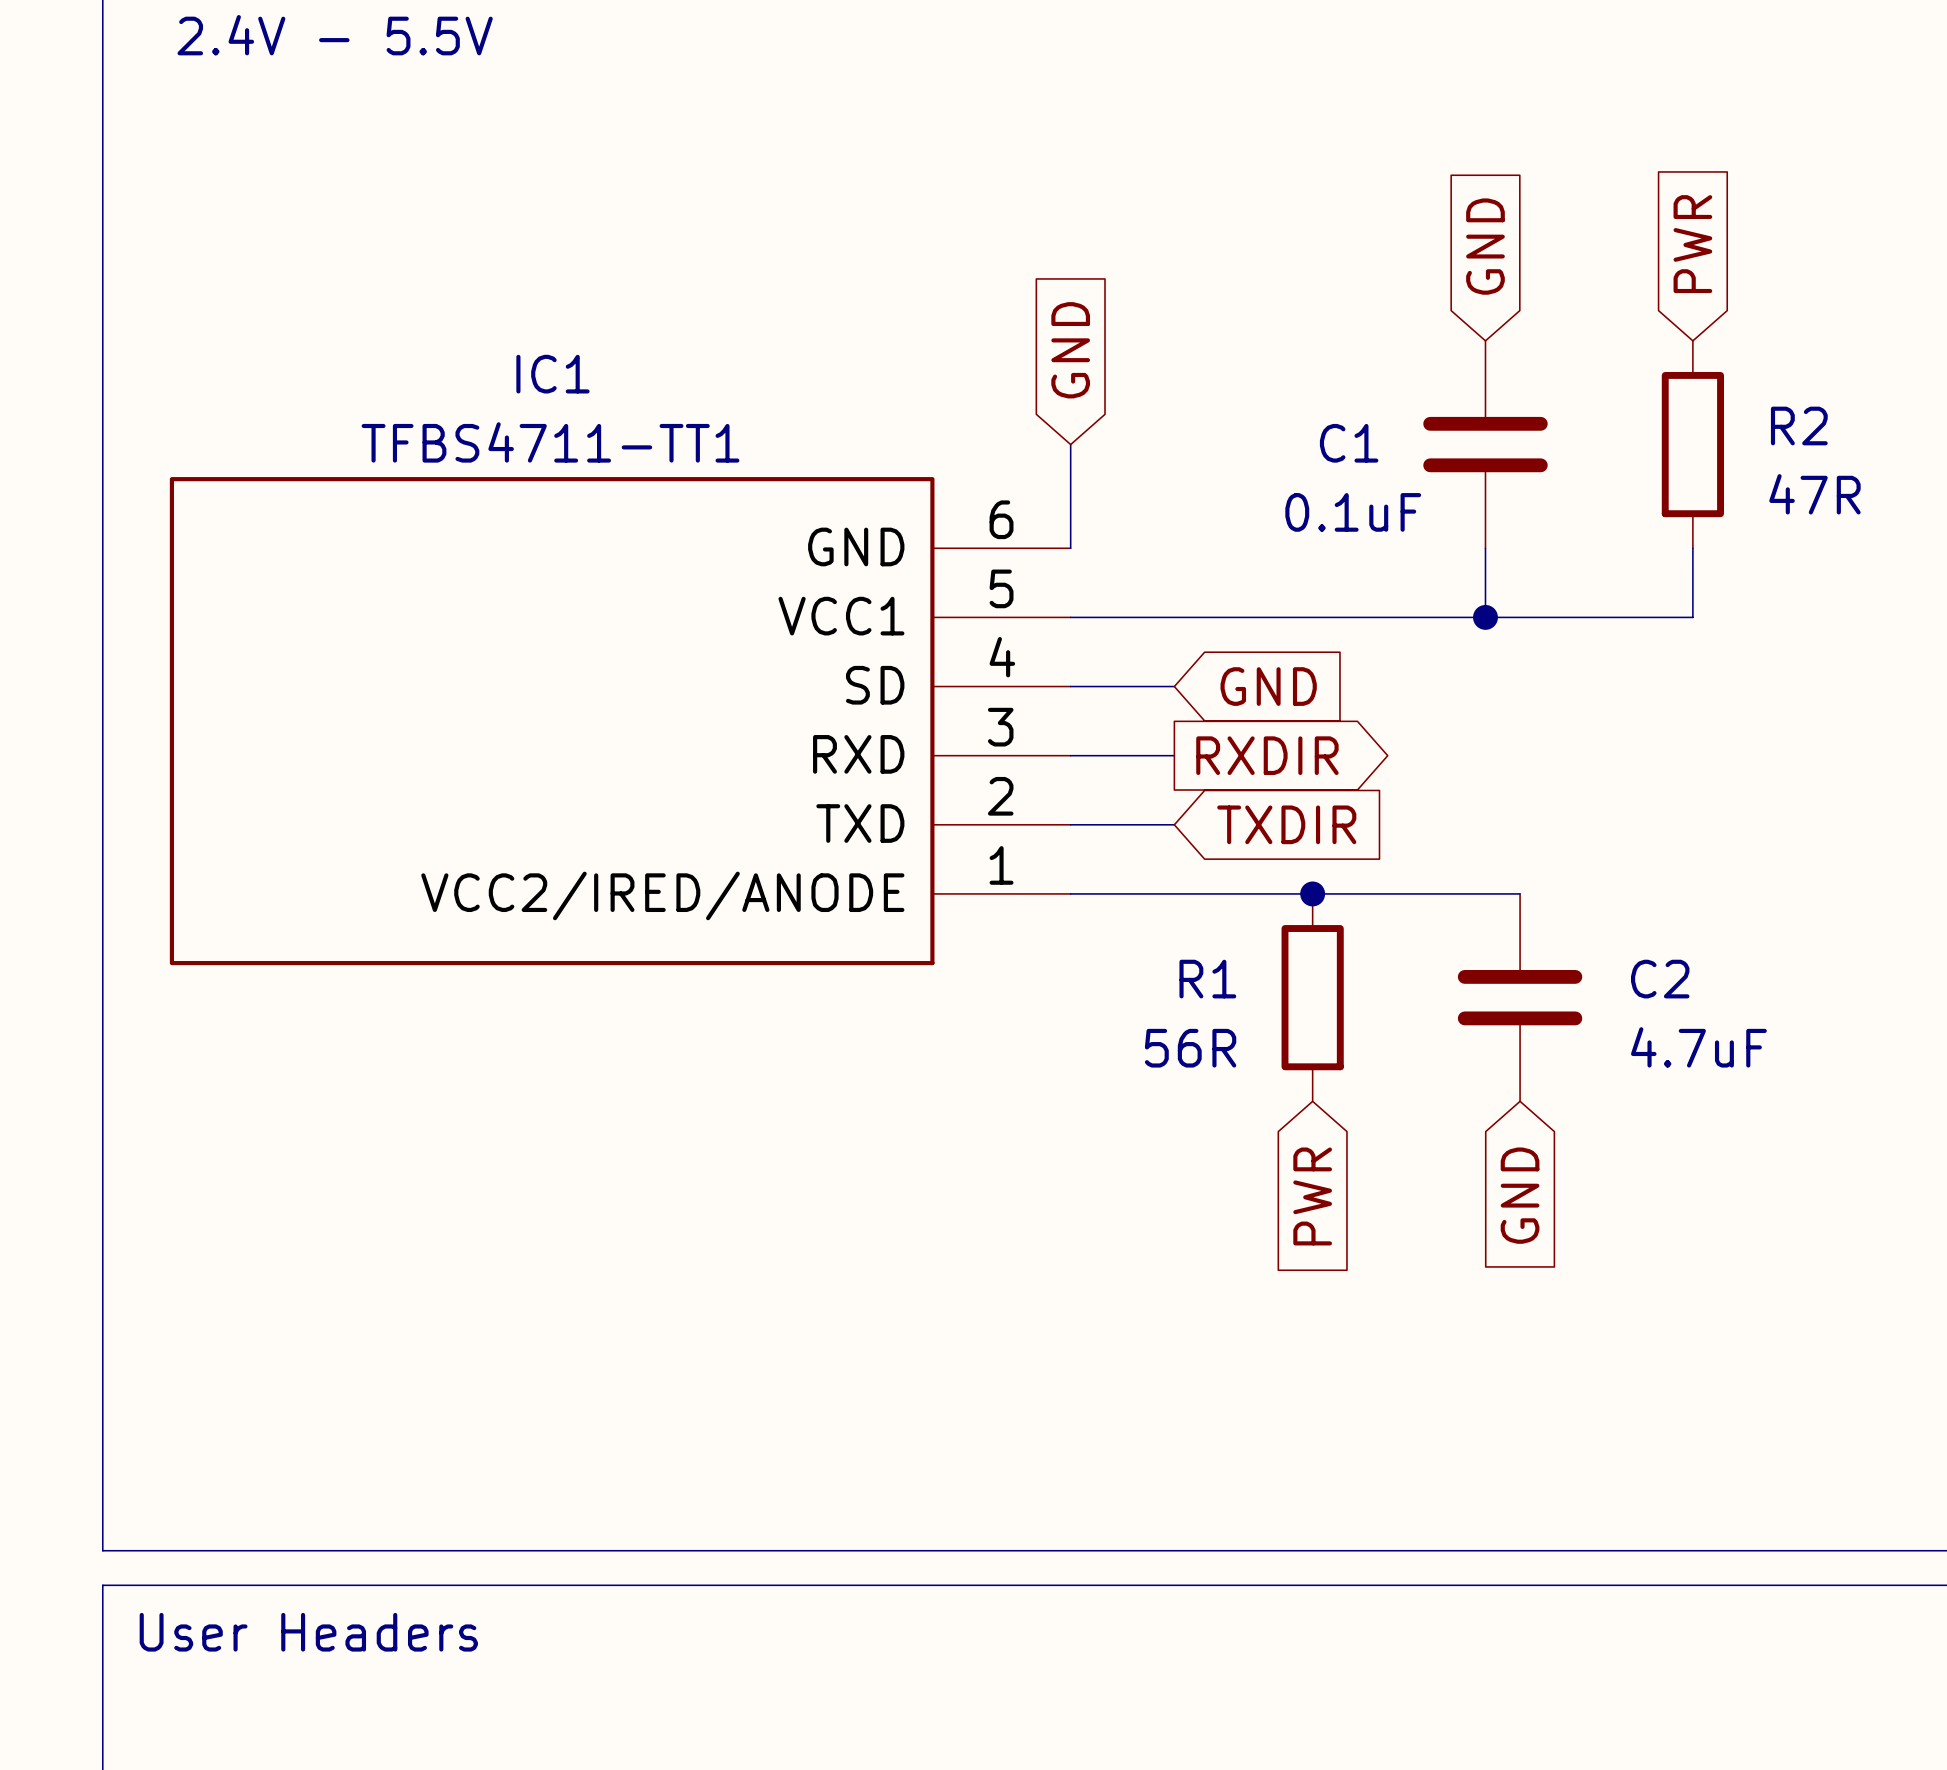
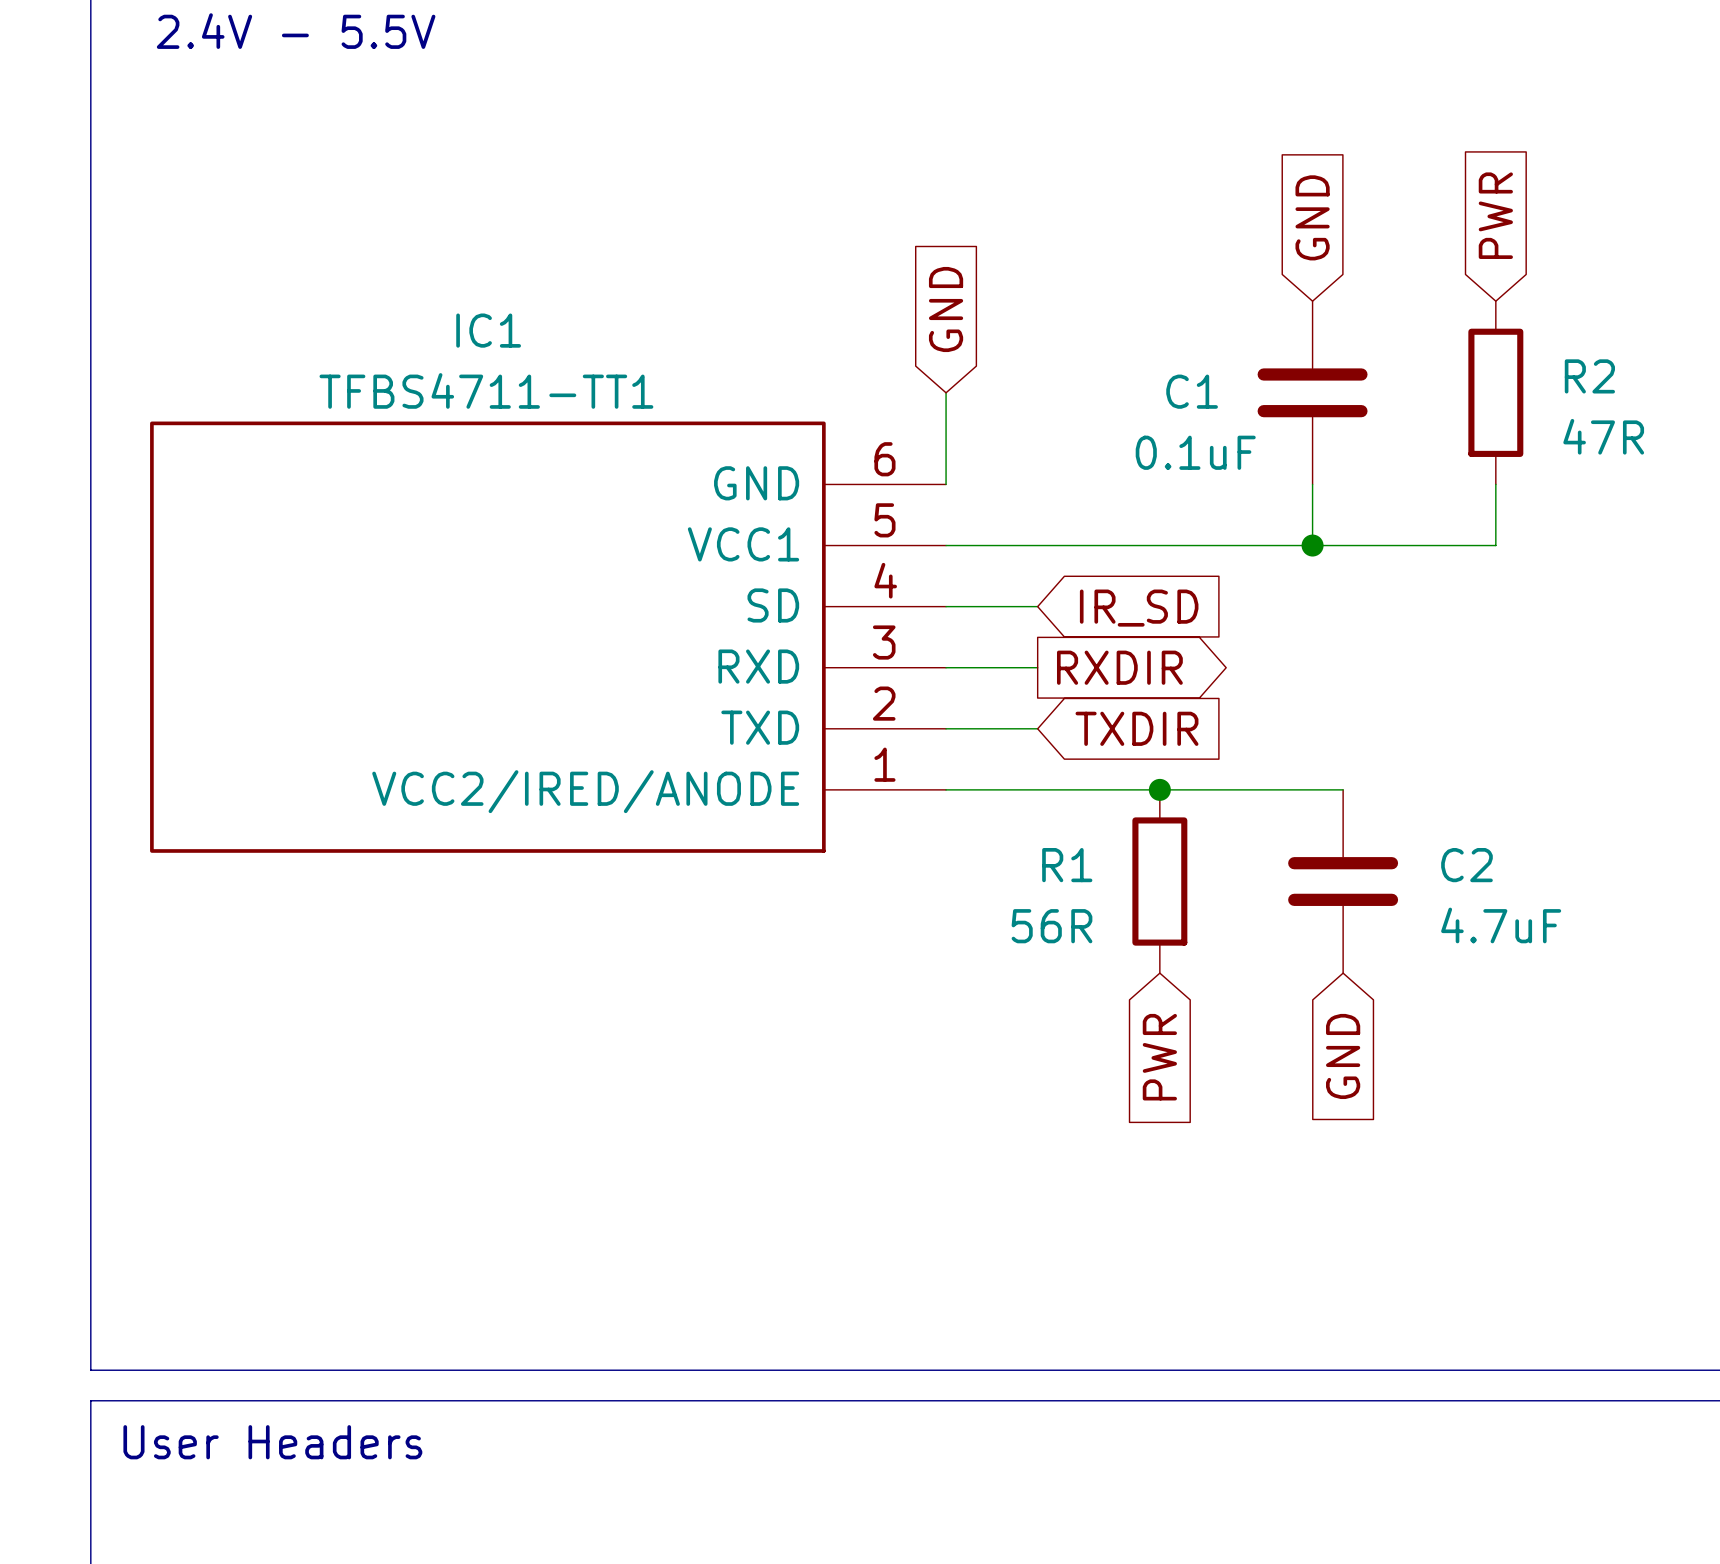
global label: GND (1268, 686) -> IR_SD (1139, 608)

